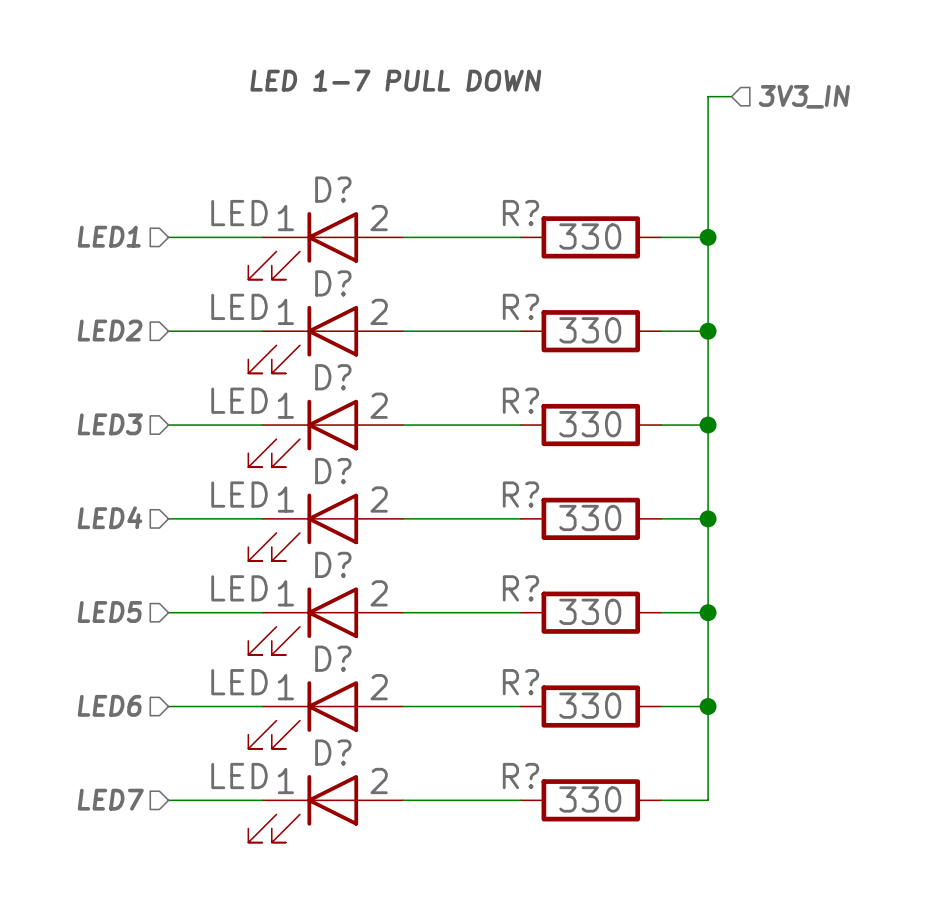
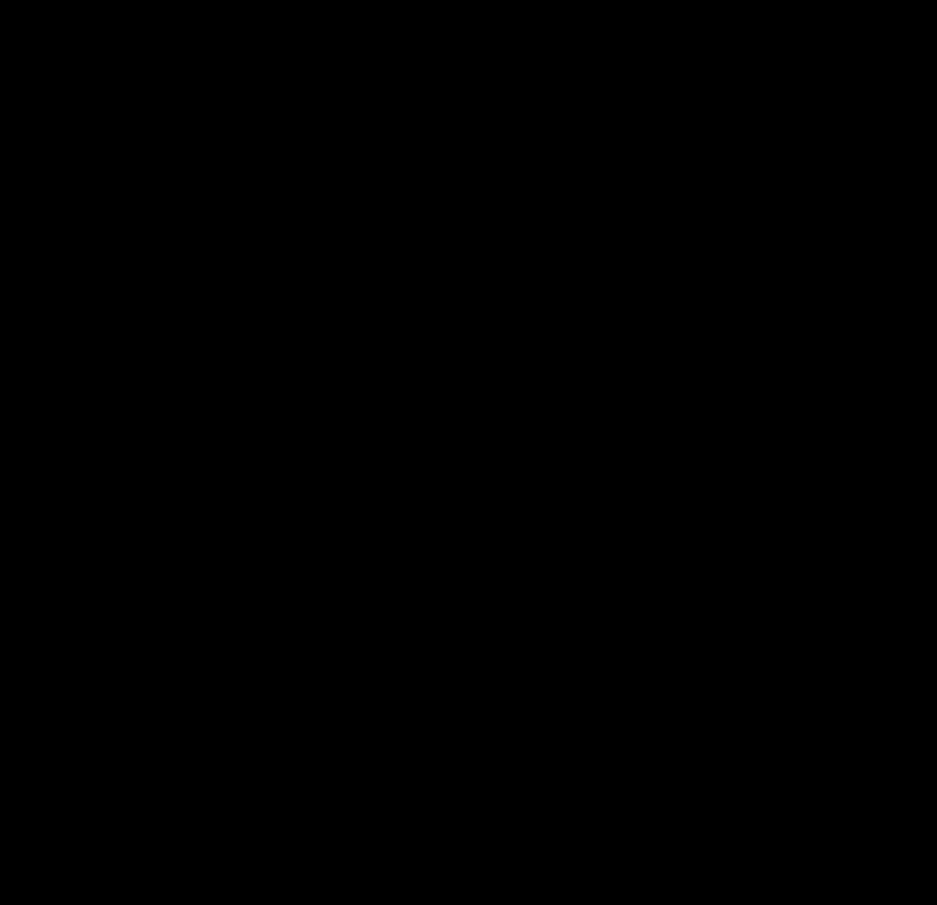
text: LED 1-7 PULL DOWN (395, 80) -> none
wire: (731, 96) (708, 96) (708, 800) (661, 800) -> none
hierarchical label: 3V3_IN (804, 96) -> none
hierarchical label: LED1 (109, 236) -> none
wire: (168, 237) (262, 237) -> none
wire: (403, 237) (520, 237) -> none
R?: 330 (590, 237) -> none
wire: (661, 237) (708, 237) -> none
junction: (708, 237) -> none
D?: LED (325, 245) -> none
hierarchical label: LED2 (110, 330) -> none
wire: (168, 331) (262, 331) -> none
wire: (403, 331) (520, 331) -> none
R?: 330 (590, 331) -> none
wire: (661, 331) (708, 331) -> none
junction: (708, 331) -> none
D?: LED (325, 339) -> none
hierarchical label: LED3 (110, 424) -> none
wire: (168, 425) (262, 425) -> none
wire: (403, 425) (520, 425) -> none
R?: 330 (590, 425) -> none
wire: (661, 425) (708, 425) -> none
junction: (708, 425) -> none
D?: LED (325, 433) -> none
hierarchical label: LED4 (110, 517) -> none
wire: (168, 518) (262, 518) -> none
wire: (403, 518) (520, 518) -> none
R?: 330 (590, 518) -> none
wire: (661, 518) (708, 518) -> none
junction: (708, 518) -> none
D?: LED (325, 527) -> none
hierarchical label: LED5 (109, 612) -> none
wire: (168, 612) (262, 612) -> none
wire: (403, 612) (520, 612) -> none
R?: 330 (590, 612) -> none
wire: (661, 612) (708, 612) -> none
junction: (708, 612) -> none
D?: LED (325, 621) -> none
hierarchical label: LED6 (109, 705) -> none
wire: (168, 706) (262, 706) -> none
wire: (403, 706) (520, 706) -> none
R?: 330 (590, 706) -> none
wire: (661, 706) (708, 706) -> none
junction: (708, 706) -> none
D?: LED (325, 714) -> none
hierarchical label: LED7 (110, 799) -> none
wire: (168, 800) (262, 800) -> none
wire: (403, 800) (520, 800) -> none
R?: 330 (590, 800) -> none
D?: LED (325, 808) -> none

